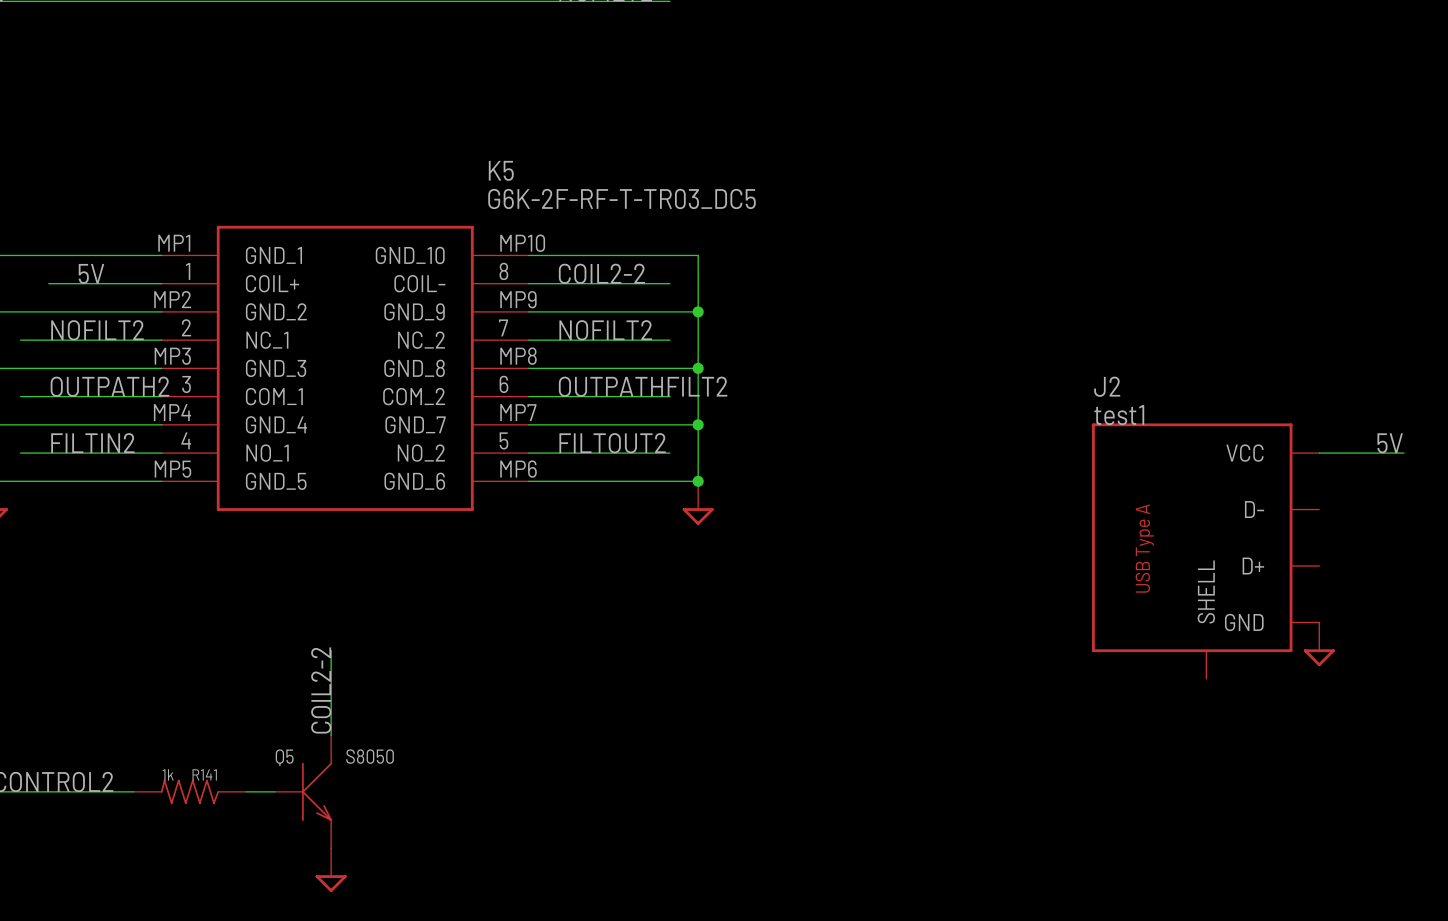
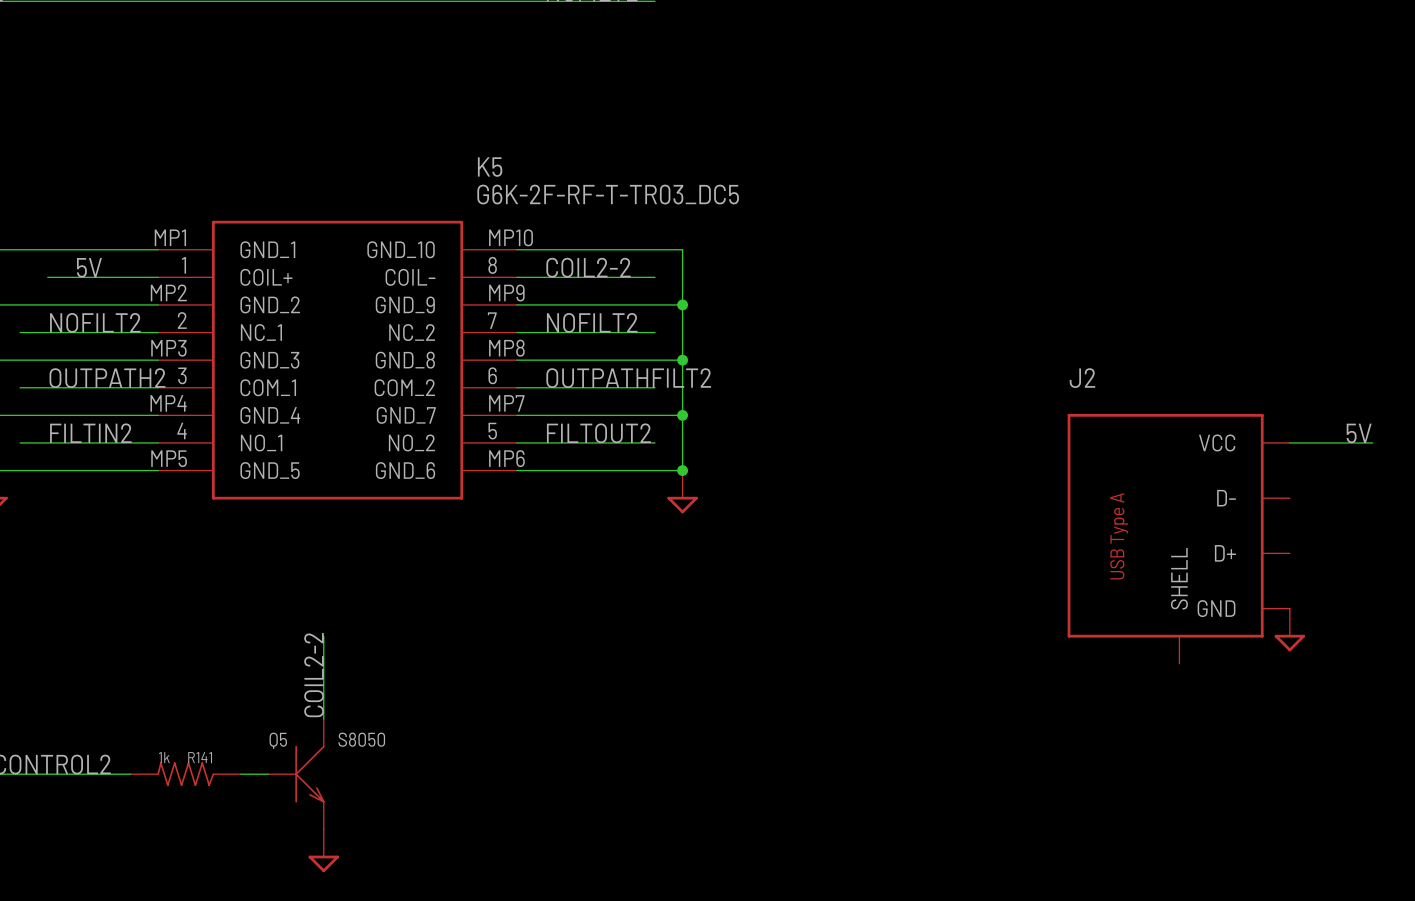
J2 value: test1 (1119, 415) -> none

